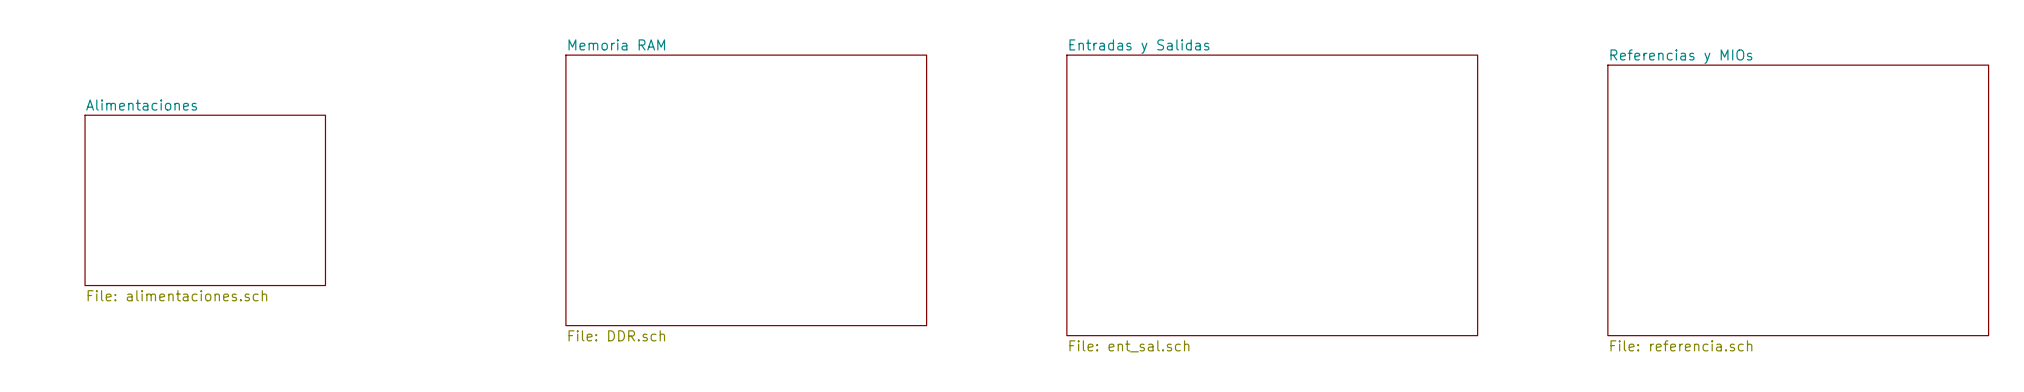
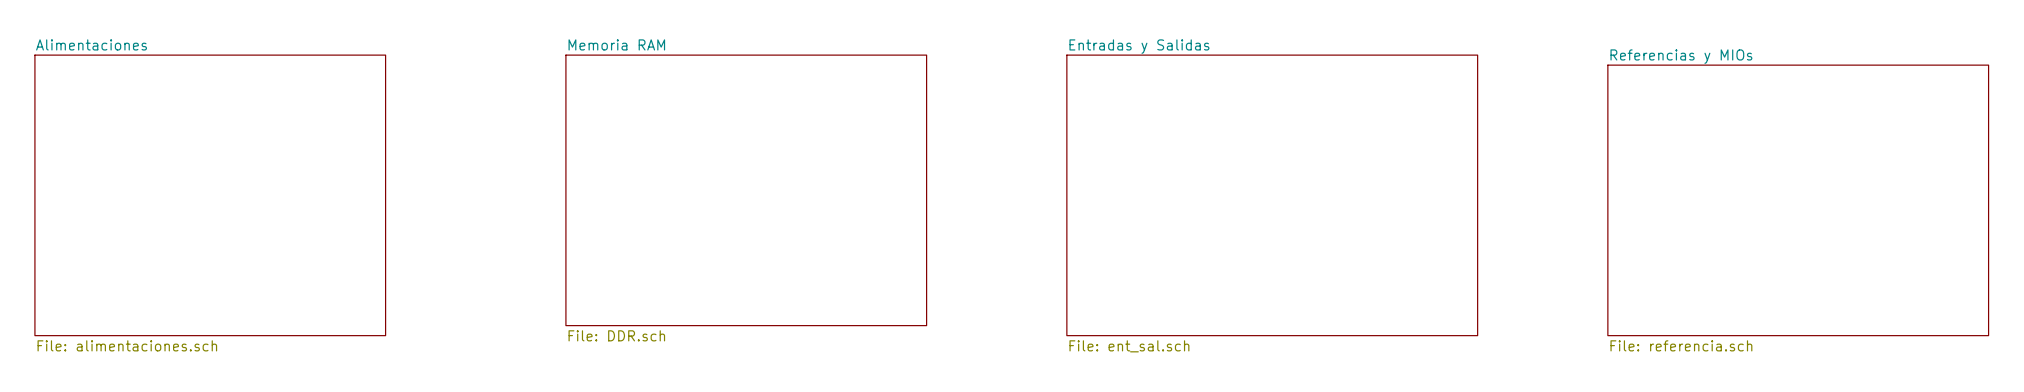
sheet Alimentaciones name position: Alimentaciones (141, 105) -> Alimentaciones (91, 44)
sheet Alimentaciones shape: [85, 115, 326, 286] -> [34, 55, 386, 336]
sheet Alimentaciones value position: File: alimentaciones.sch (177, 295) -> File: alimentaciones.sch (127, 345)

